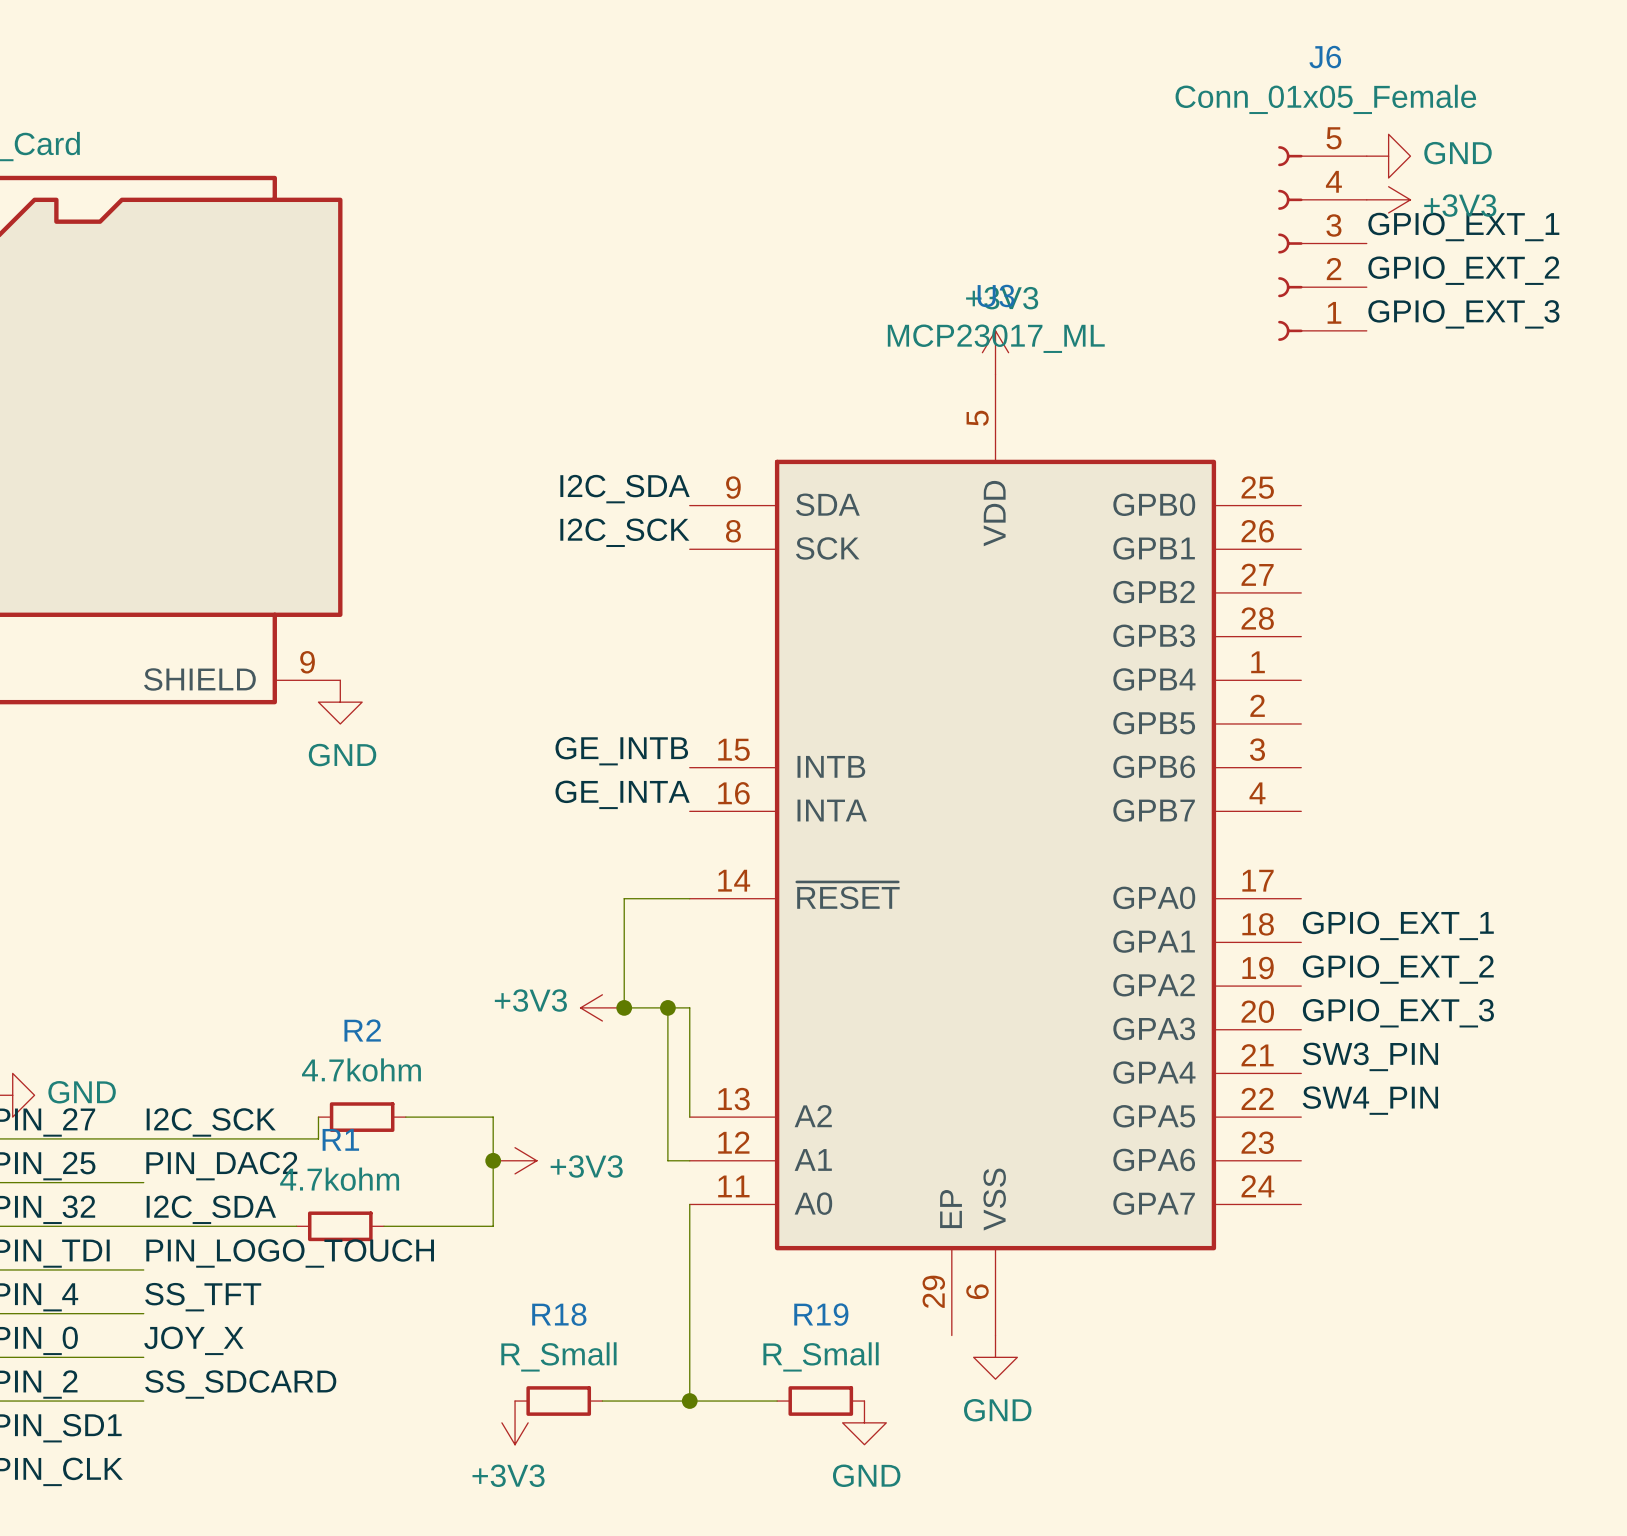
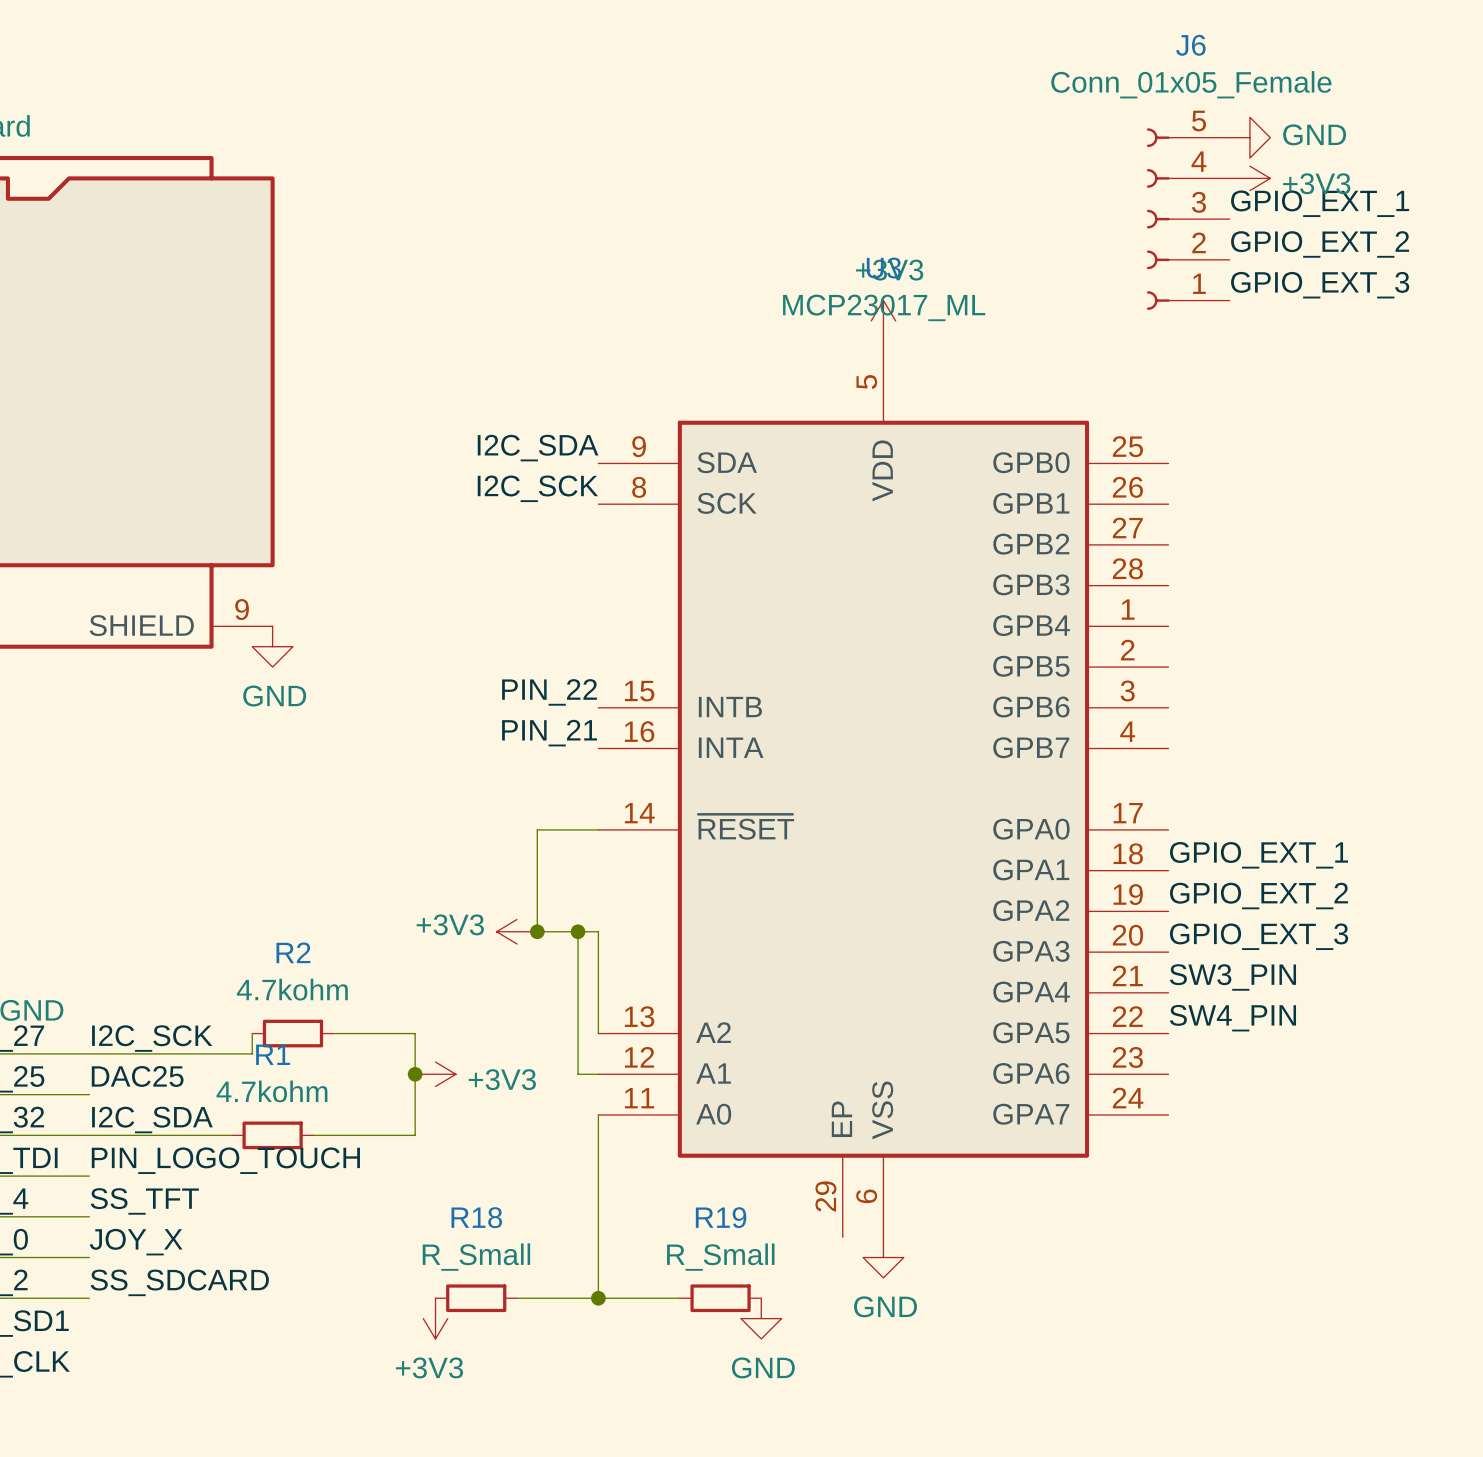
label: GE_INTB (621, 751) -> PIN_22 (549, 692)
label: GE_INTA (622, 794) -> PIN_21 (549, 733)
label: PIN_DAC2 (221, 1166) -> DAC25 (137, 1076)

